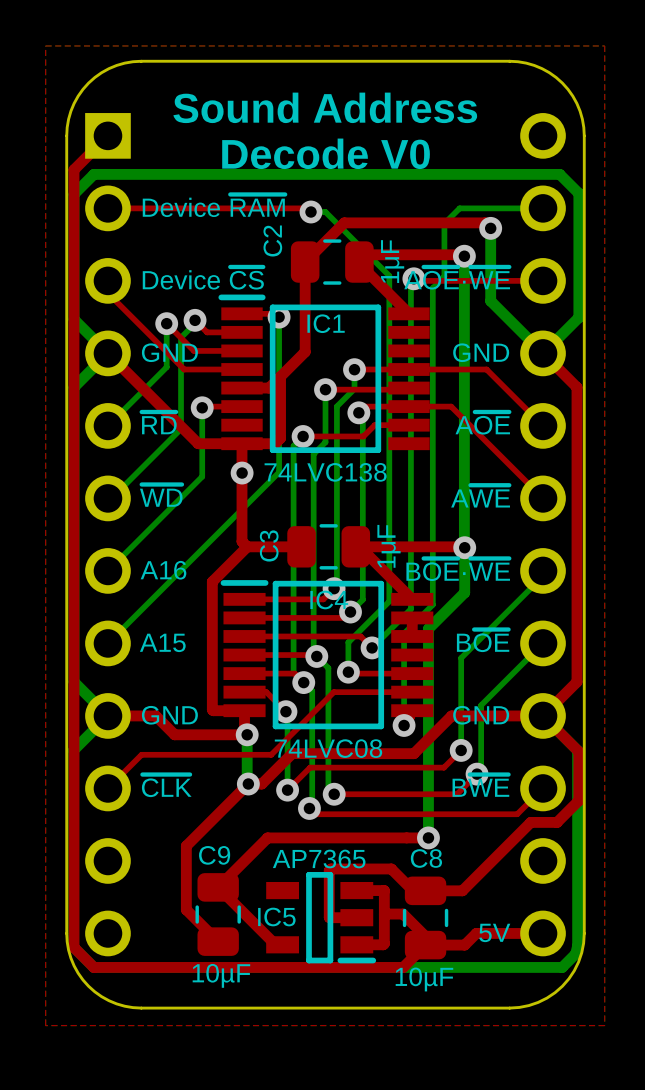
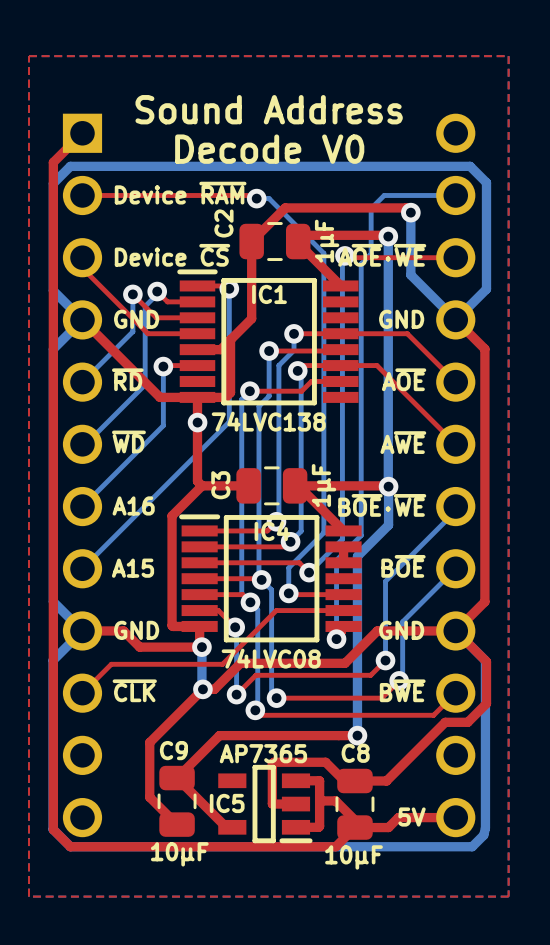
board edge: (141, 61) (518, 61) (534, 65) (556, 77) (568, 89) (576, 103) (582, 119) (584, 135) (584, 933) (581, 952) (574, 970) (562, 986) (538, 1002) (509, 1008) (132, 1007) (116, 1003) (101, 996) (82, 979) (74, 965) (68, 950) (66, 933) (67, 127) (74, 103) (82, 89) (94, 77) (116, 65) (141, 61) -> none

